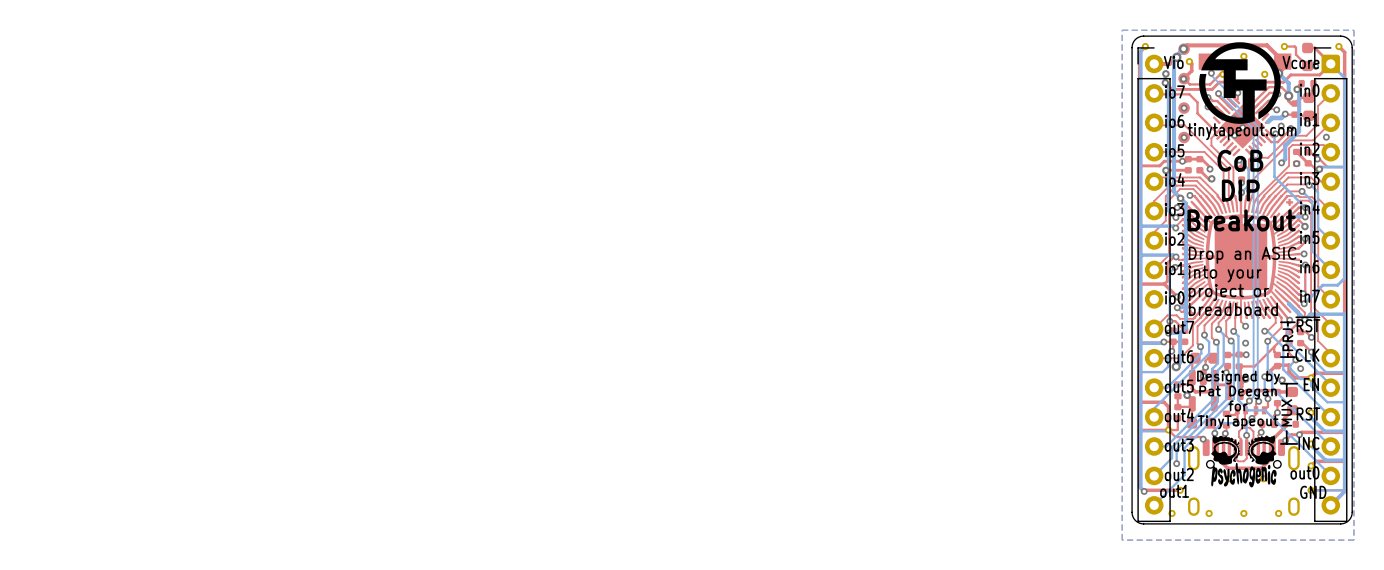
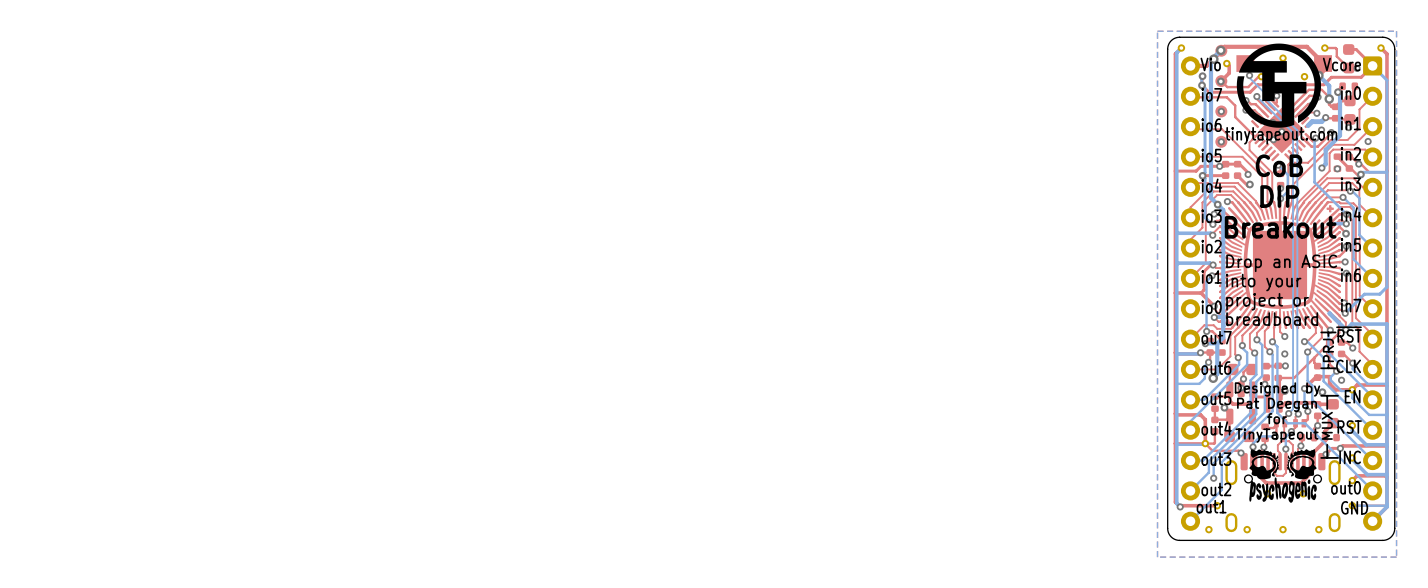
drawing: [1137, 47, 1171, 523] -> none
drawing: [1314, 47, 1348, 523] -> none

